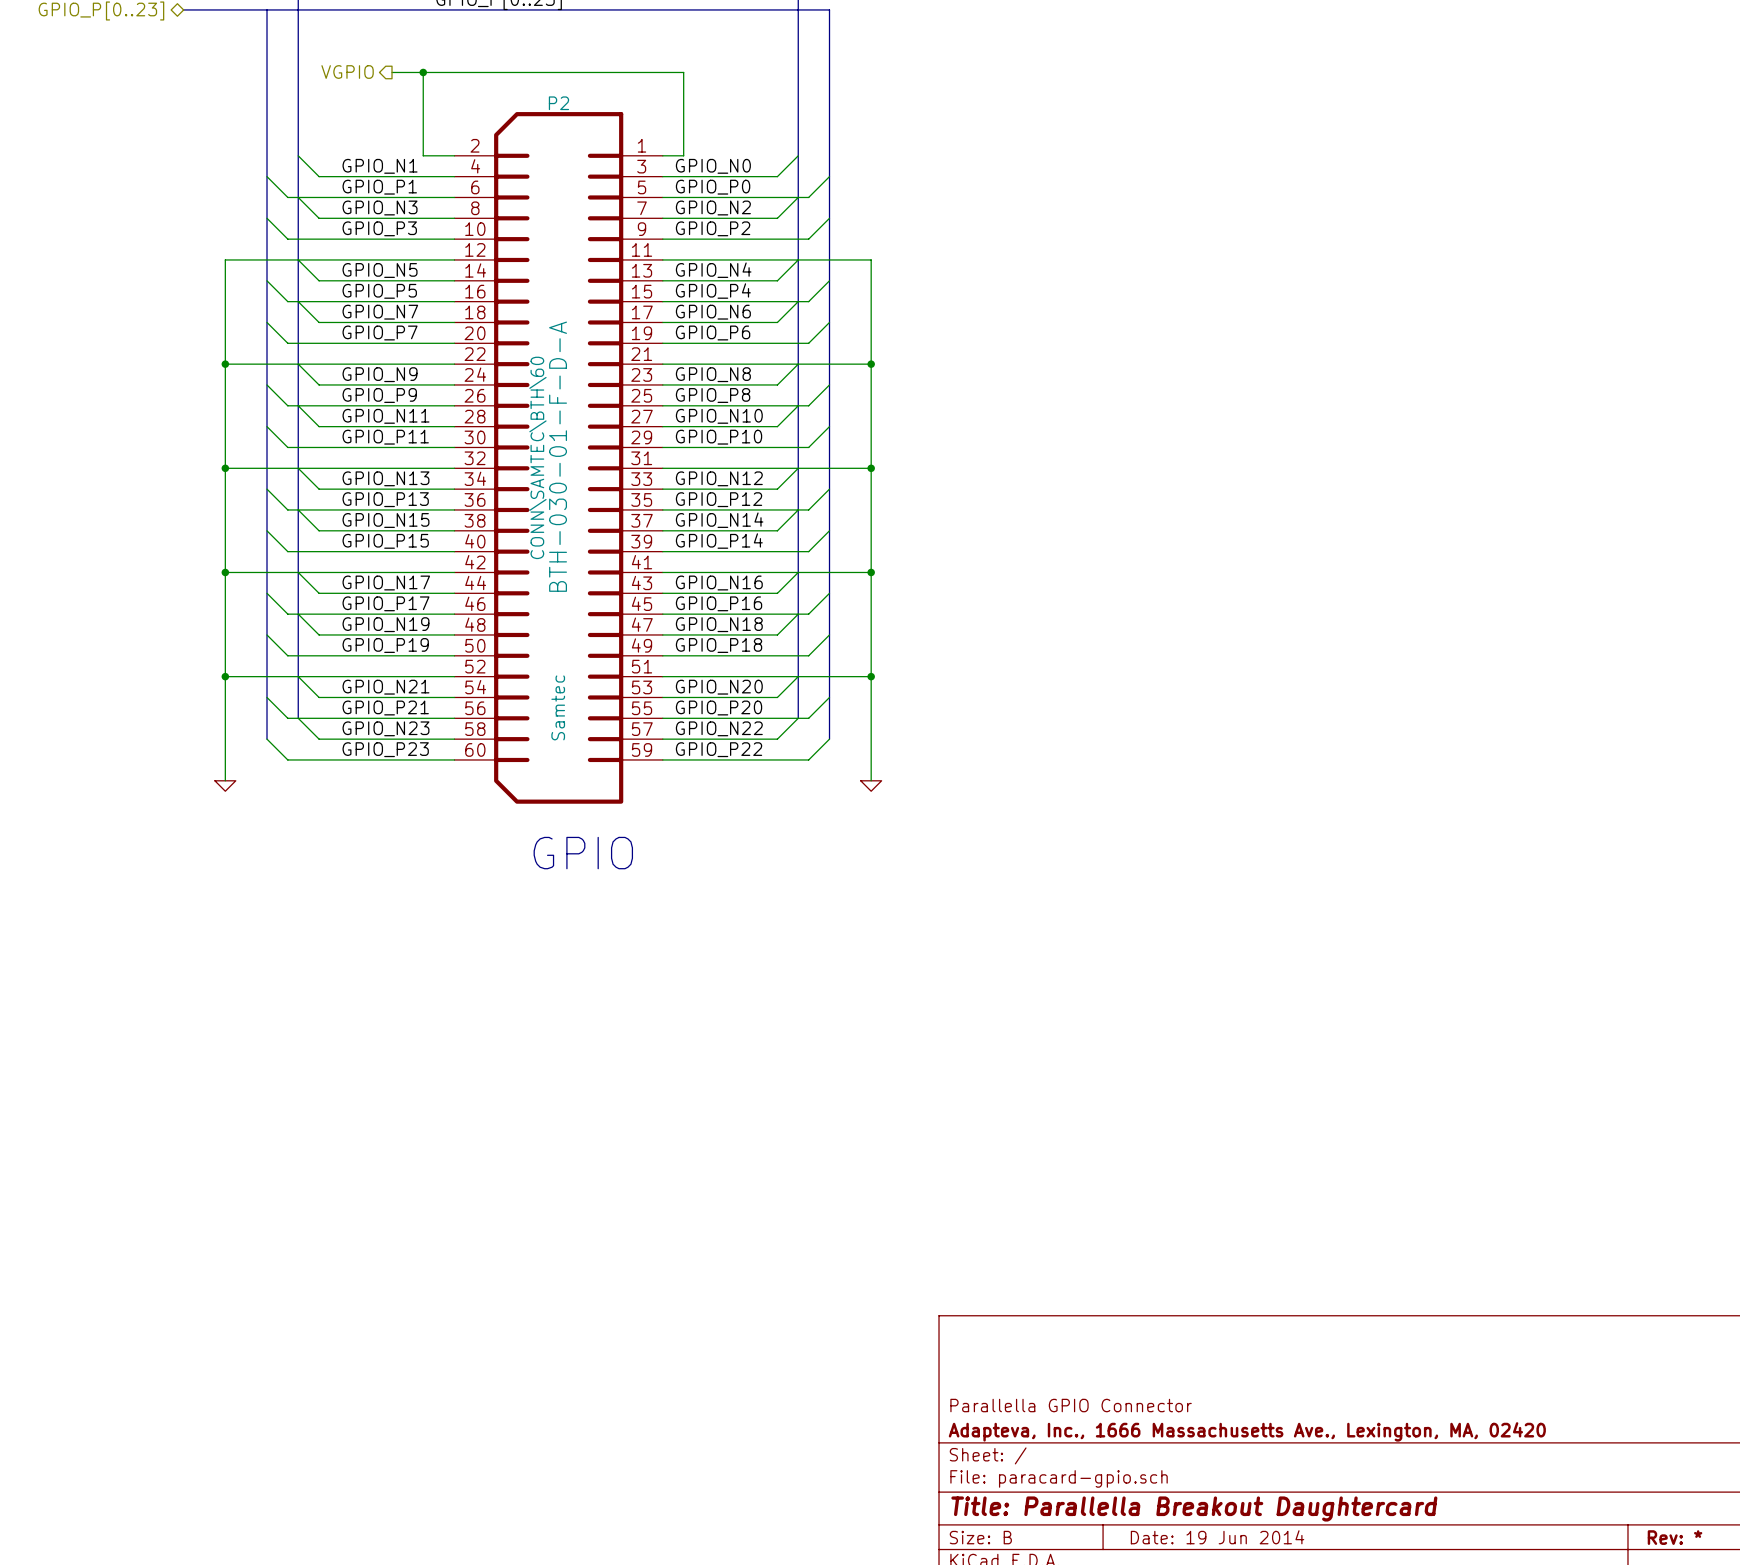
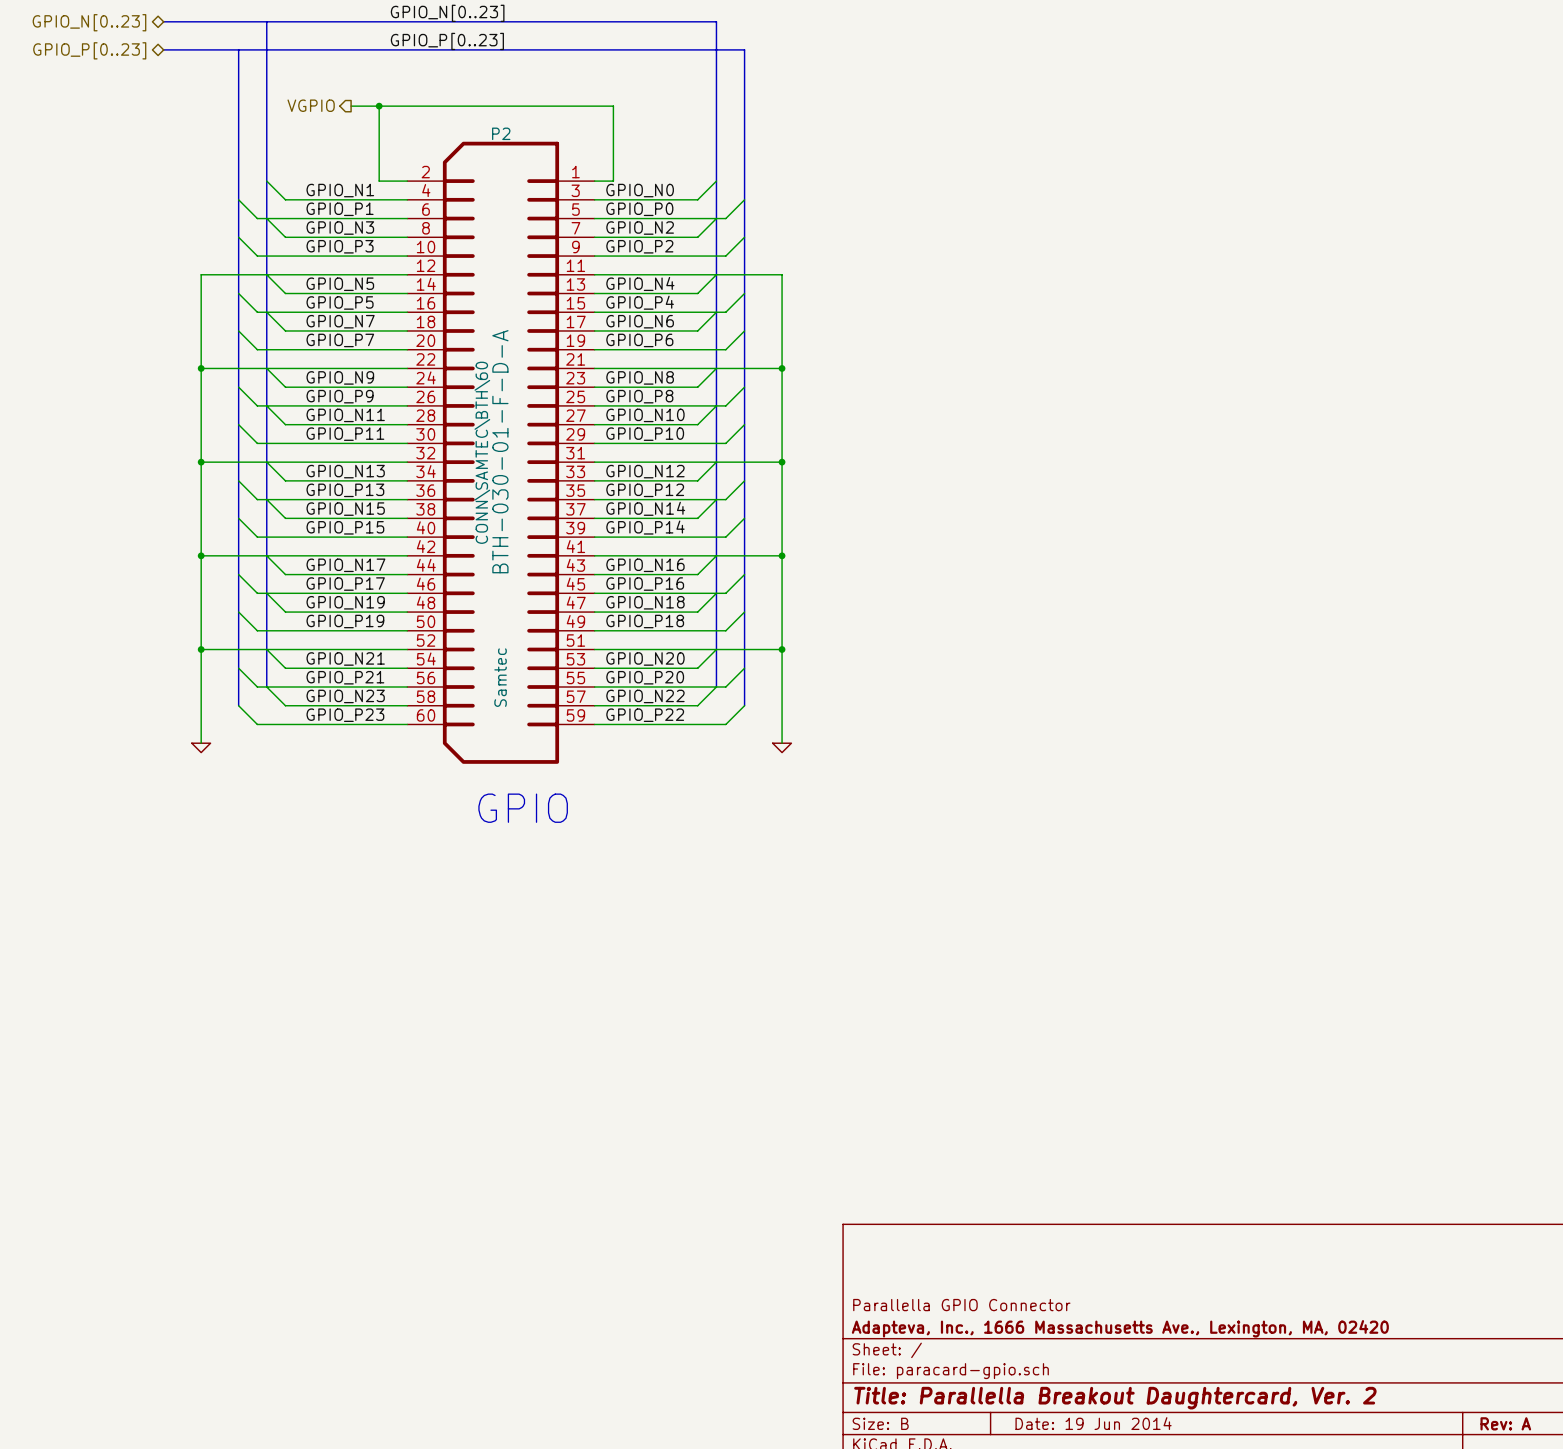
title block: Title: Parallella Breakout Daughtercard (1194, 1508) -> Title: Parallella Breakout Daughtercard, Ver. 2 (1115, 1398)
title block: Rev: * (1675, 1537) -> Rev: A (1505, 1423)

